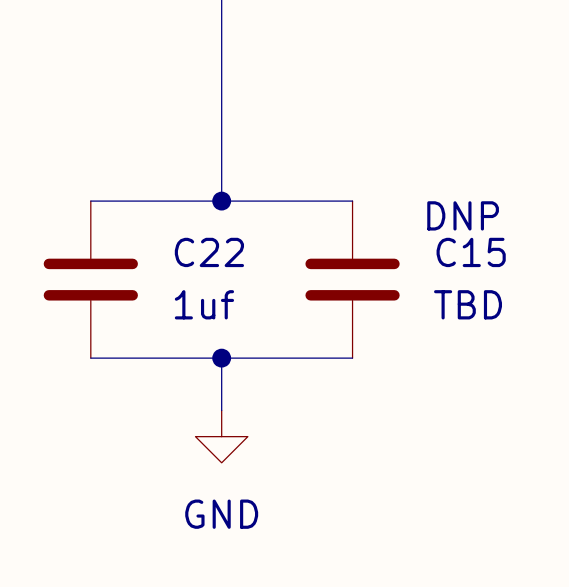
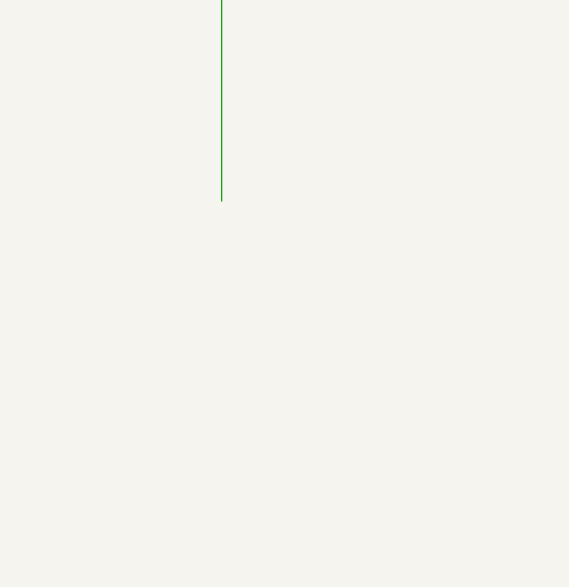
wire: (90, 201) (352, 201) -> none
junction: (221, 201) -> none
text: DNP (463, 215) -> none
C22: 1uf (90, 279) -> none
C15: TBD (352, 279) -> none
wire: (90, 358) (352, 358) -> none
wire: (221, 358) (221, 410) -> none
junction: (221, 358) -> none
power symbol: GND (221, 436) -> none

